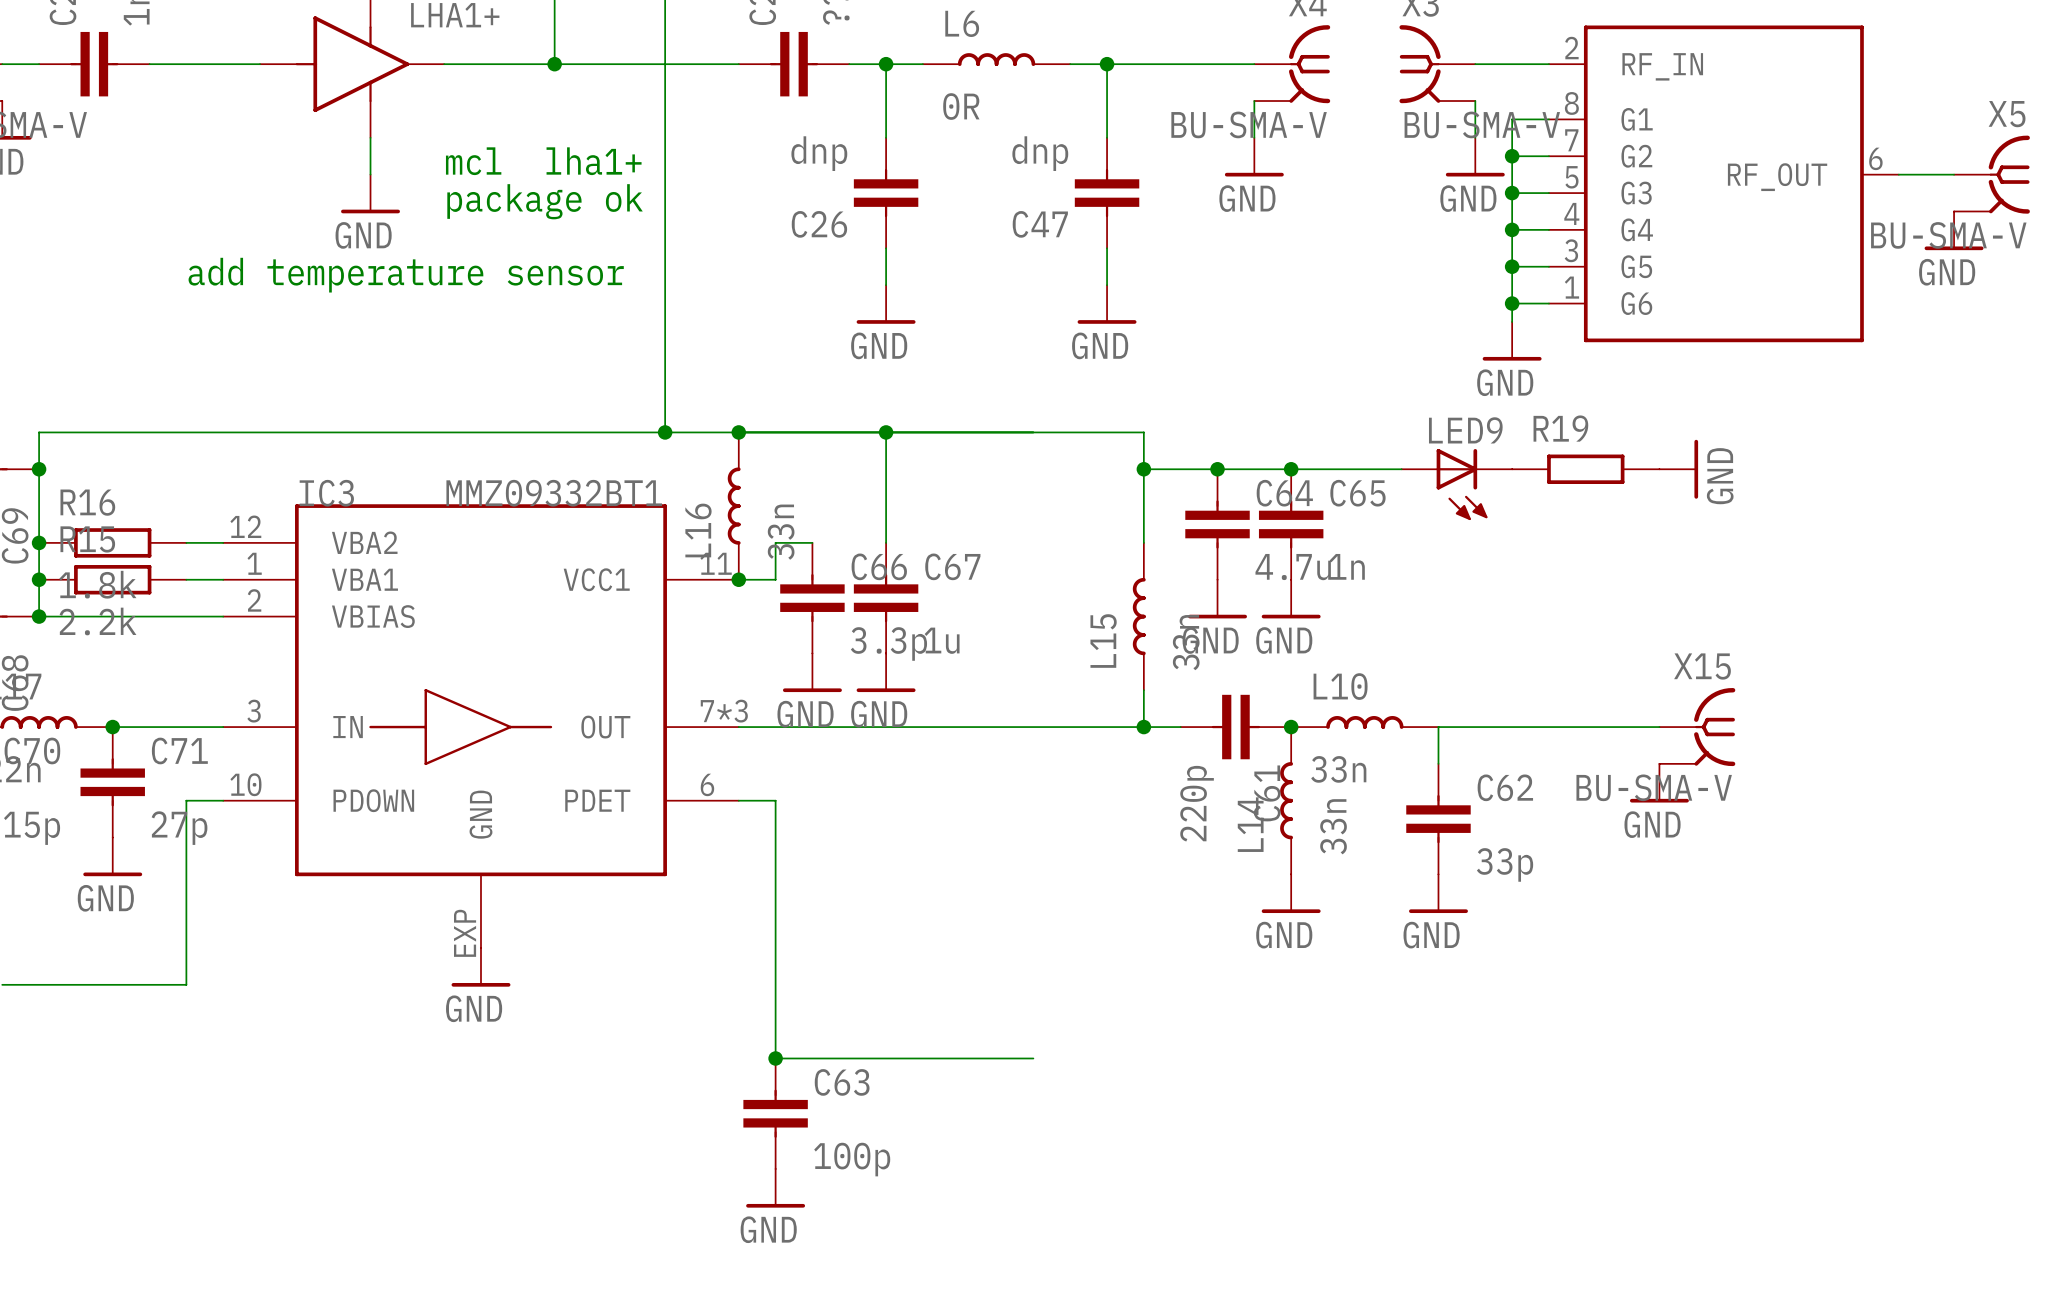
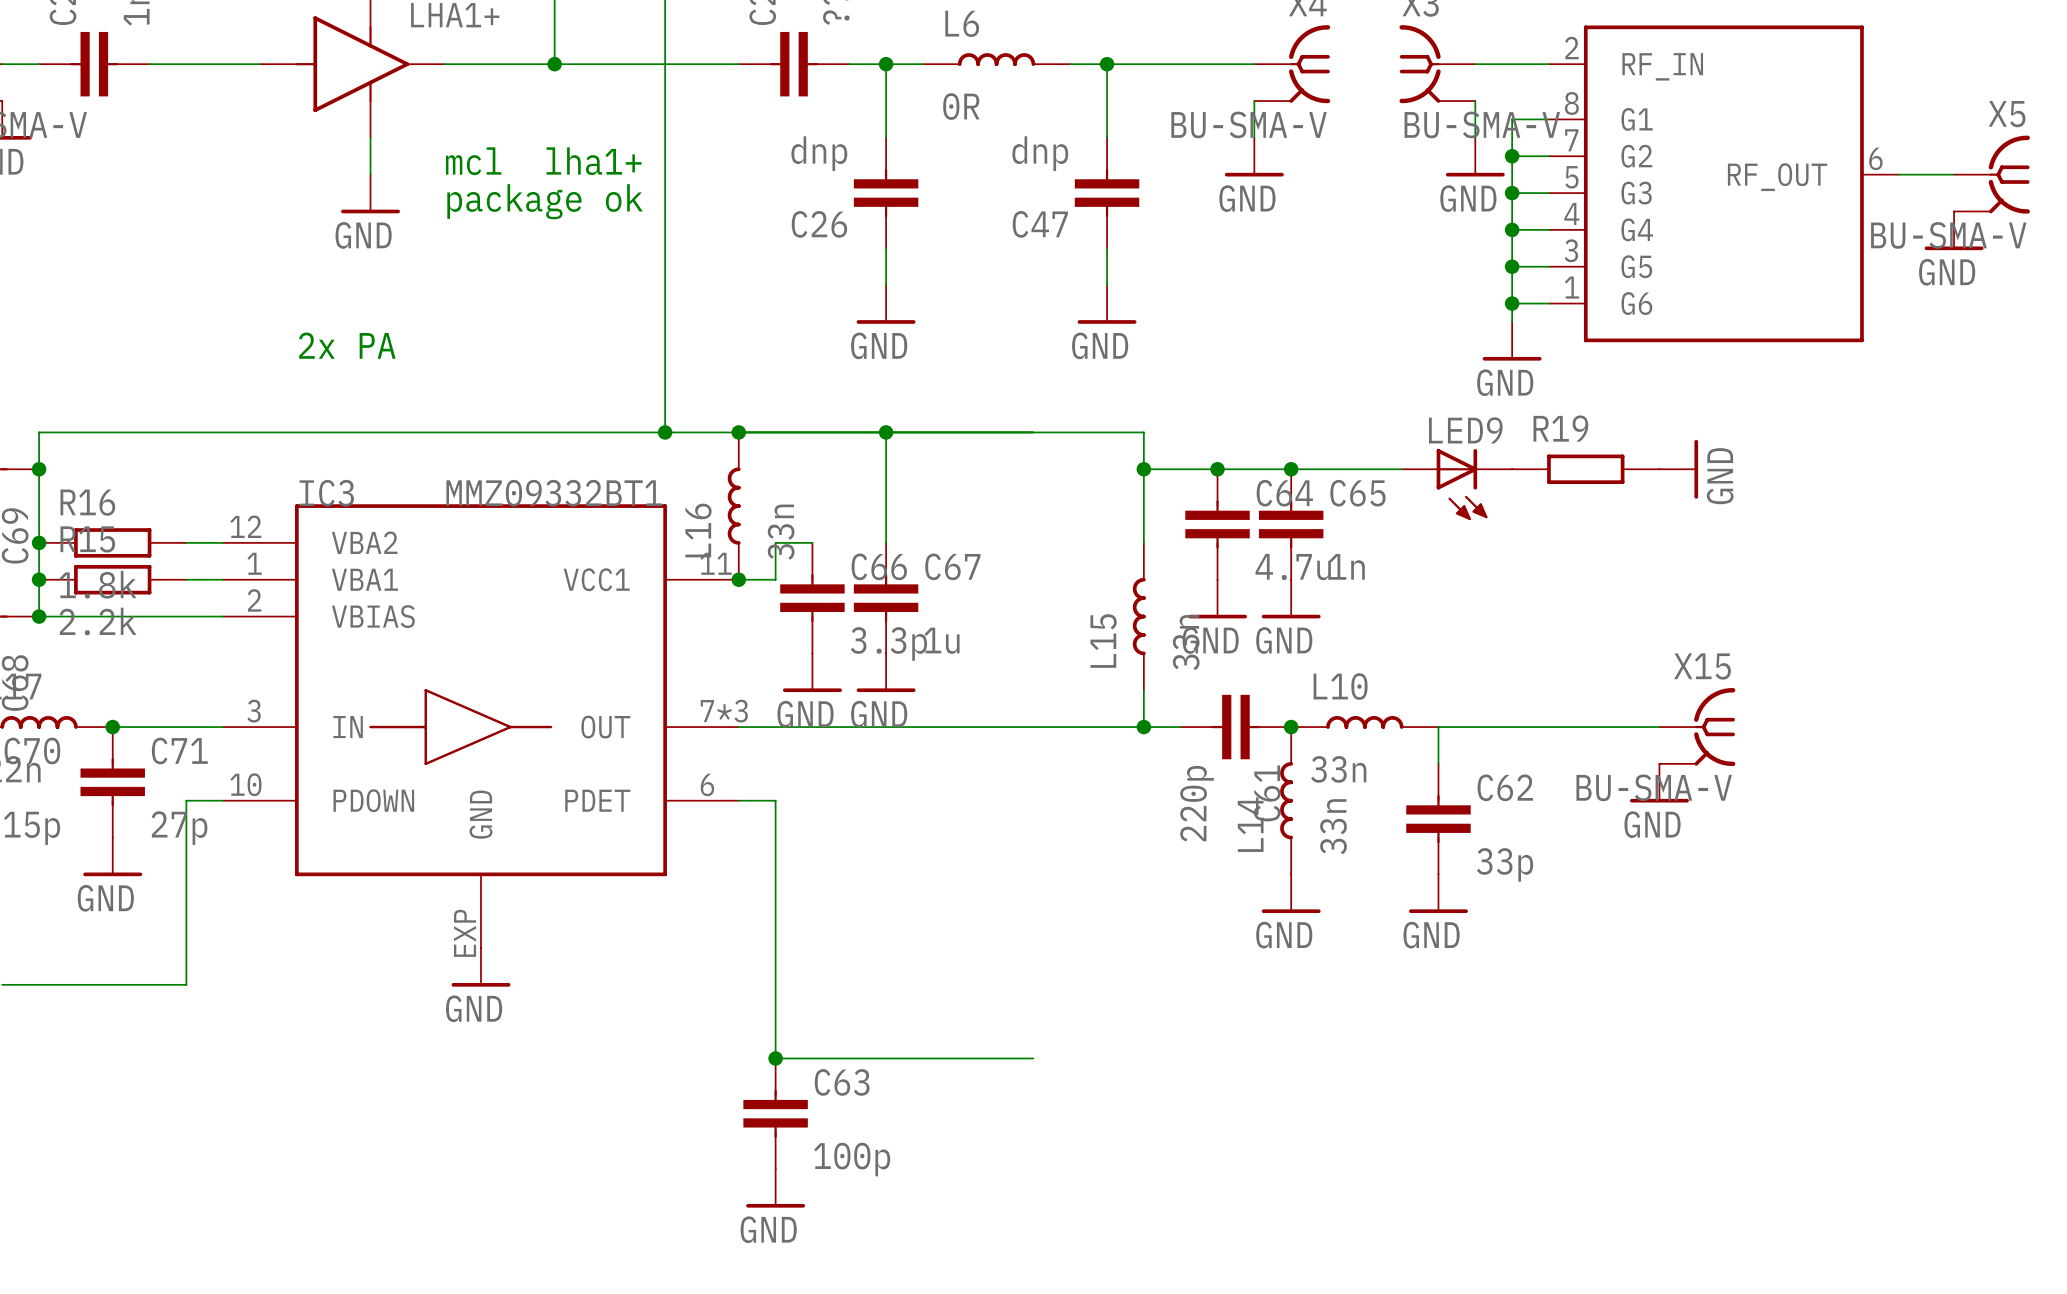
text: add temperature sensor (406, 275) -> none
text: none -> 2x PA (347, 345)

